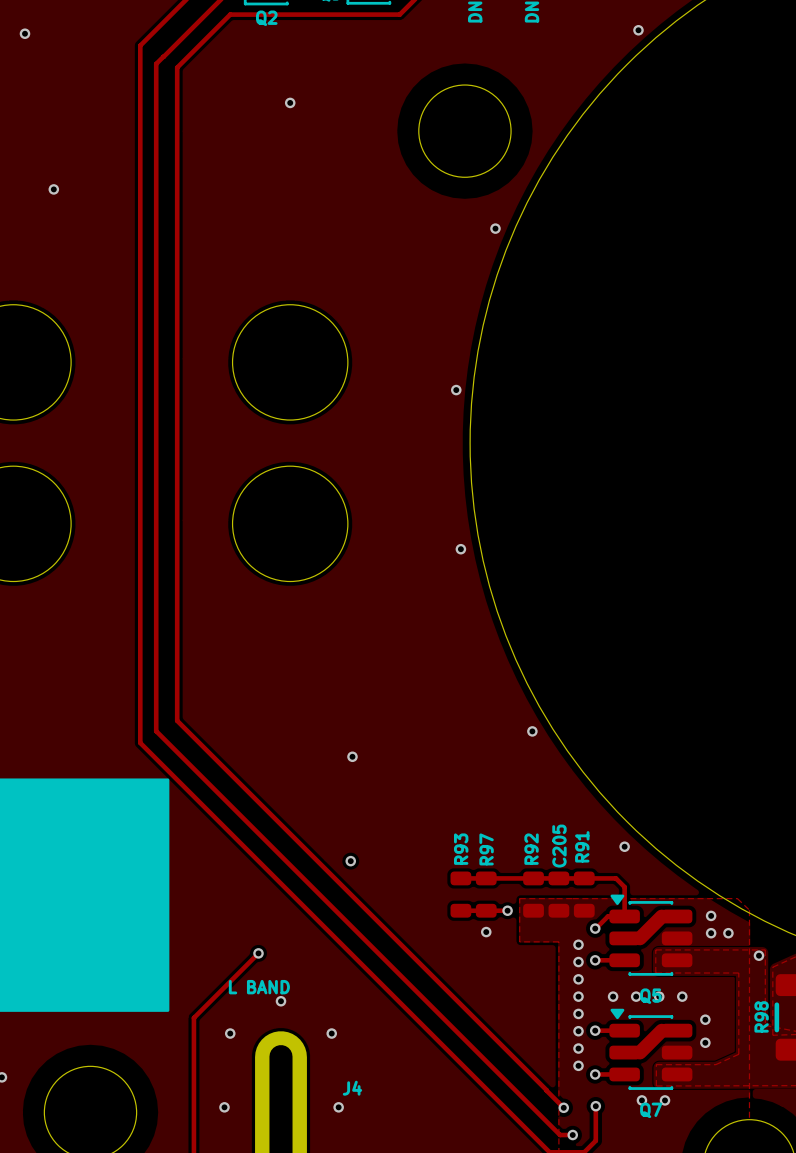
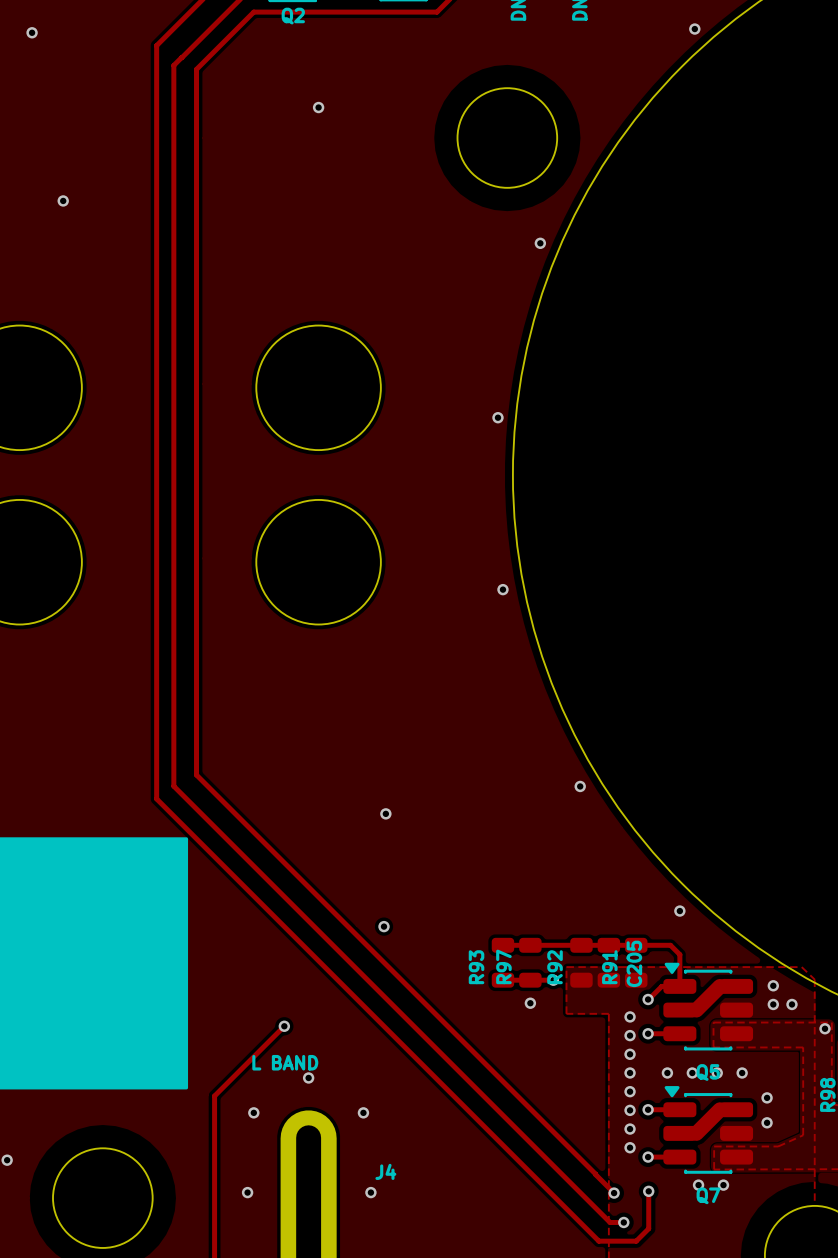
C205 name position: C205 (559, 846) -> C205 (634, 963)
R91 name position: R91 (582, 846) -> R91 (609, 967)
R93 name position: R93 (461, 849) -> R93 (476, 967)
R97 name position: R97 (486, 849) -> R97 (503, 966)
R92 name position: R92 (531, 849) -> R92 (555, 967)

